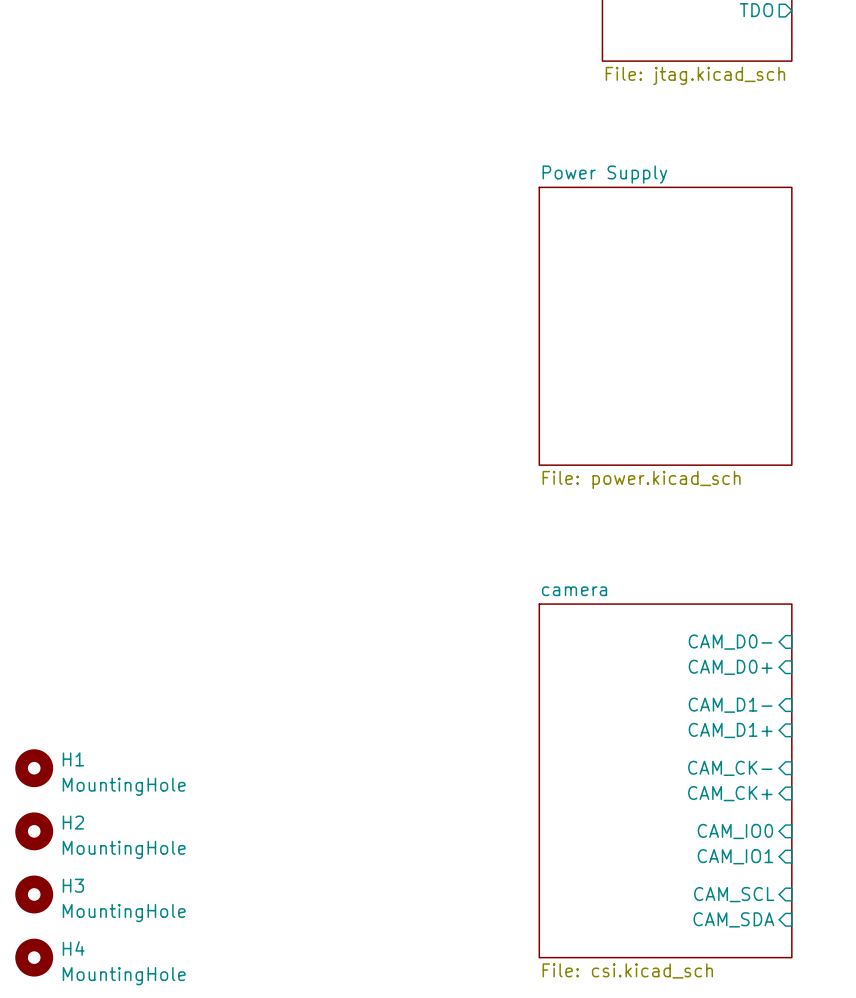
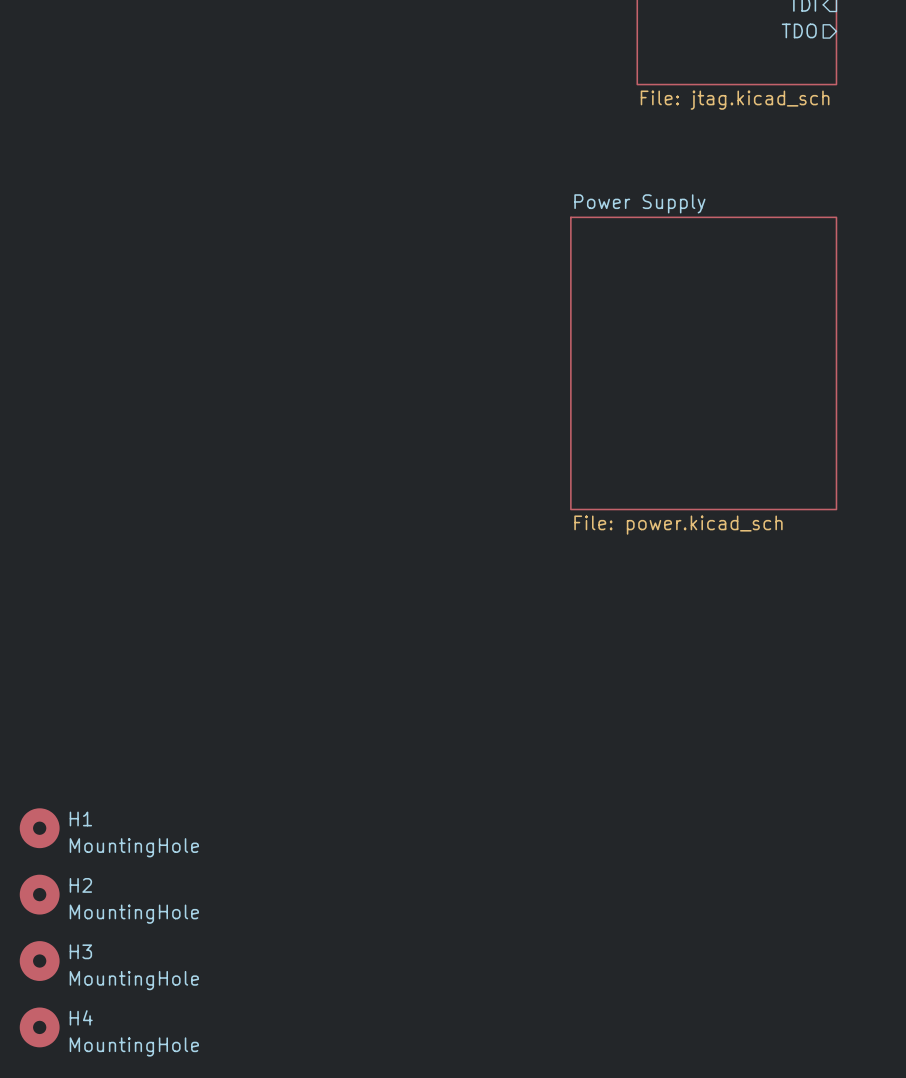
sheet pin: CAM_D0- (730, 642) -> none
sheet pin: CAM_D0+ (730, 667) -> none
sheet pin: CAM_D1- (730, 705) -> none
sheet pin: CAM_D1+ (730, 730) -> none
sheet pin: CAM_CK- (730, 768) -> none
sheet camera: File: csi.kicad_sch (665, 780) -> none
sheet pin: CAM_CK+ (730, 793) -> none
sheet pin: CAM_IO0 (735, 831) -> none
sheet pin: CAM_IO1 (735, 856) -> none
sheet pin: CAM_SCL (734, 894) -> none
sheet pin: CAM_SDA (733, 919) -> none

